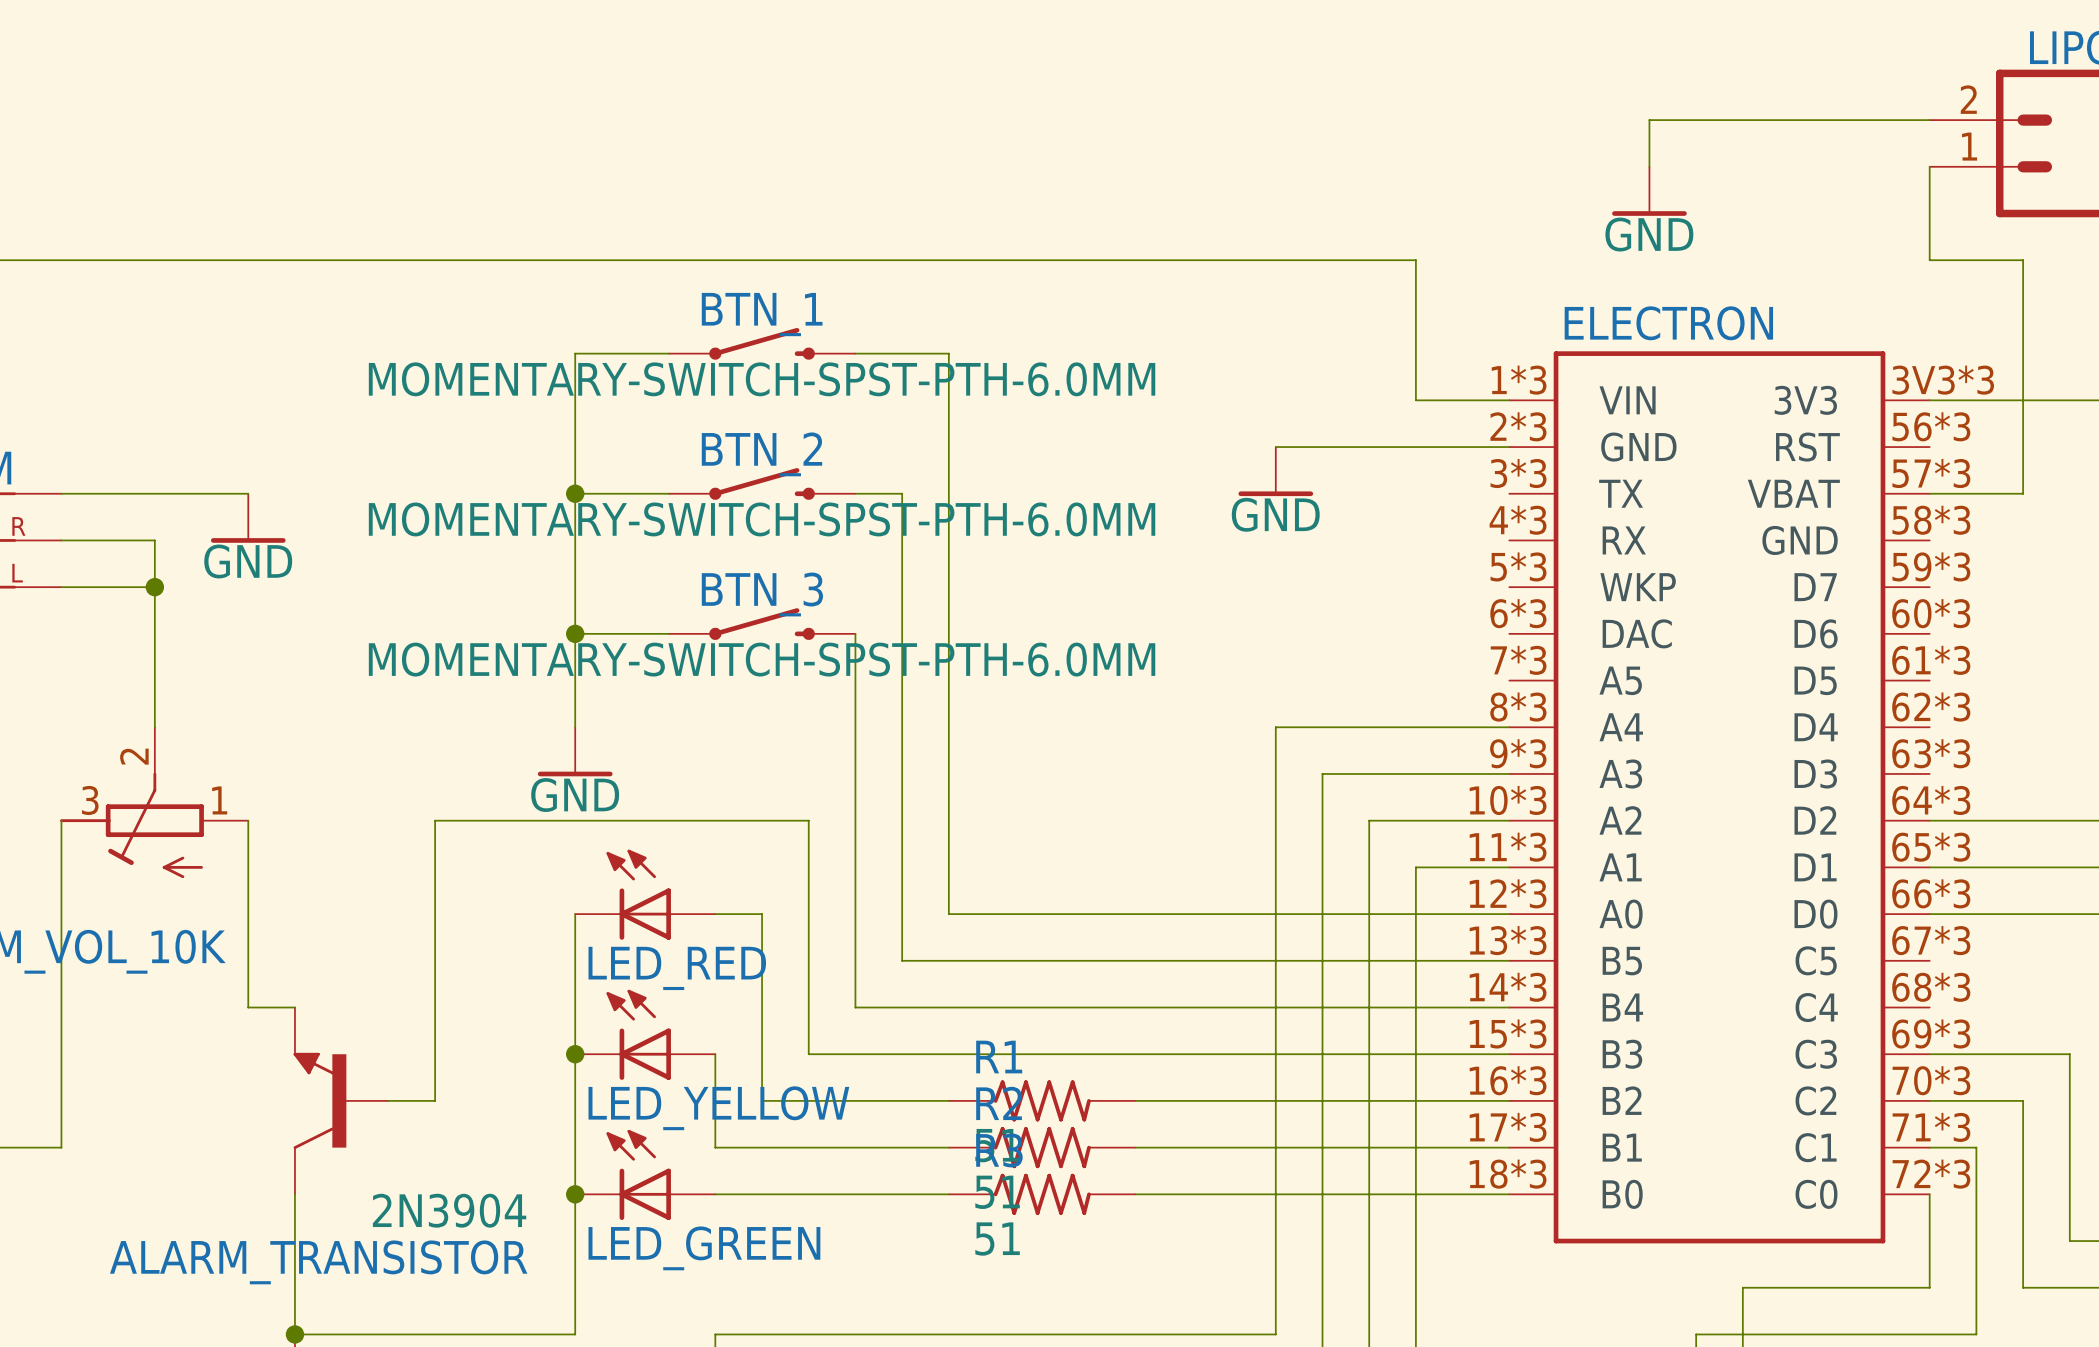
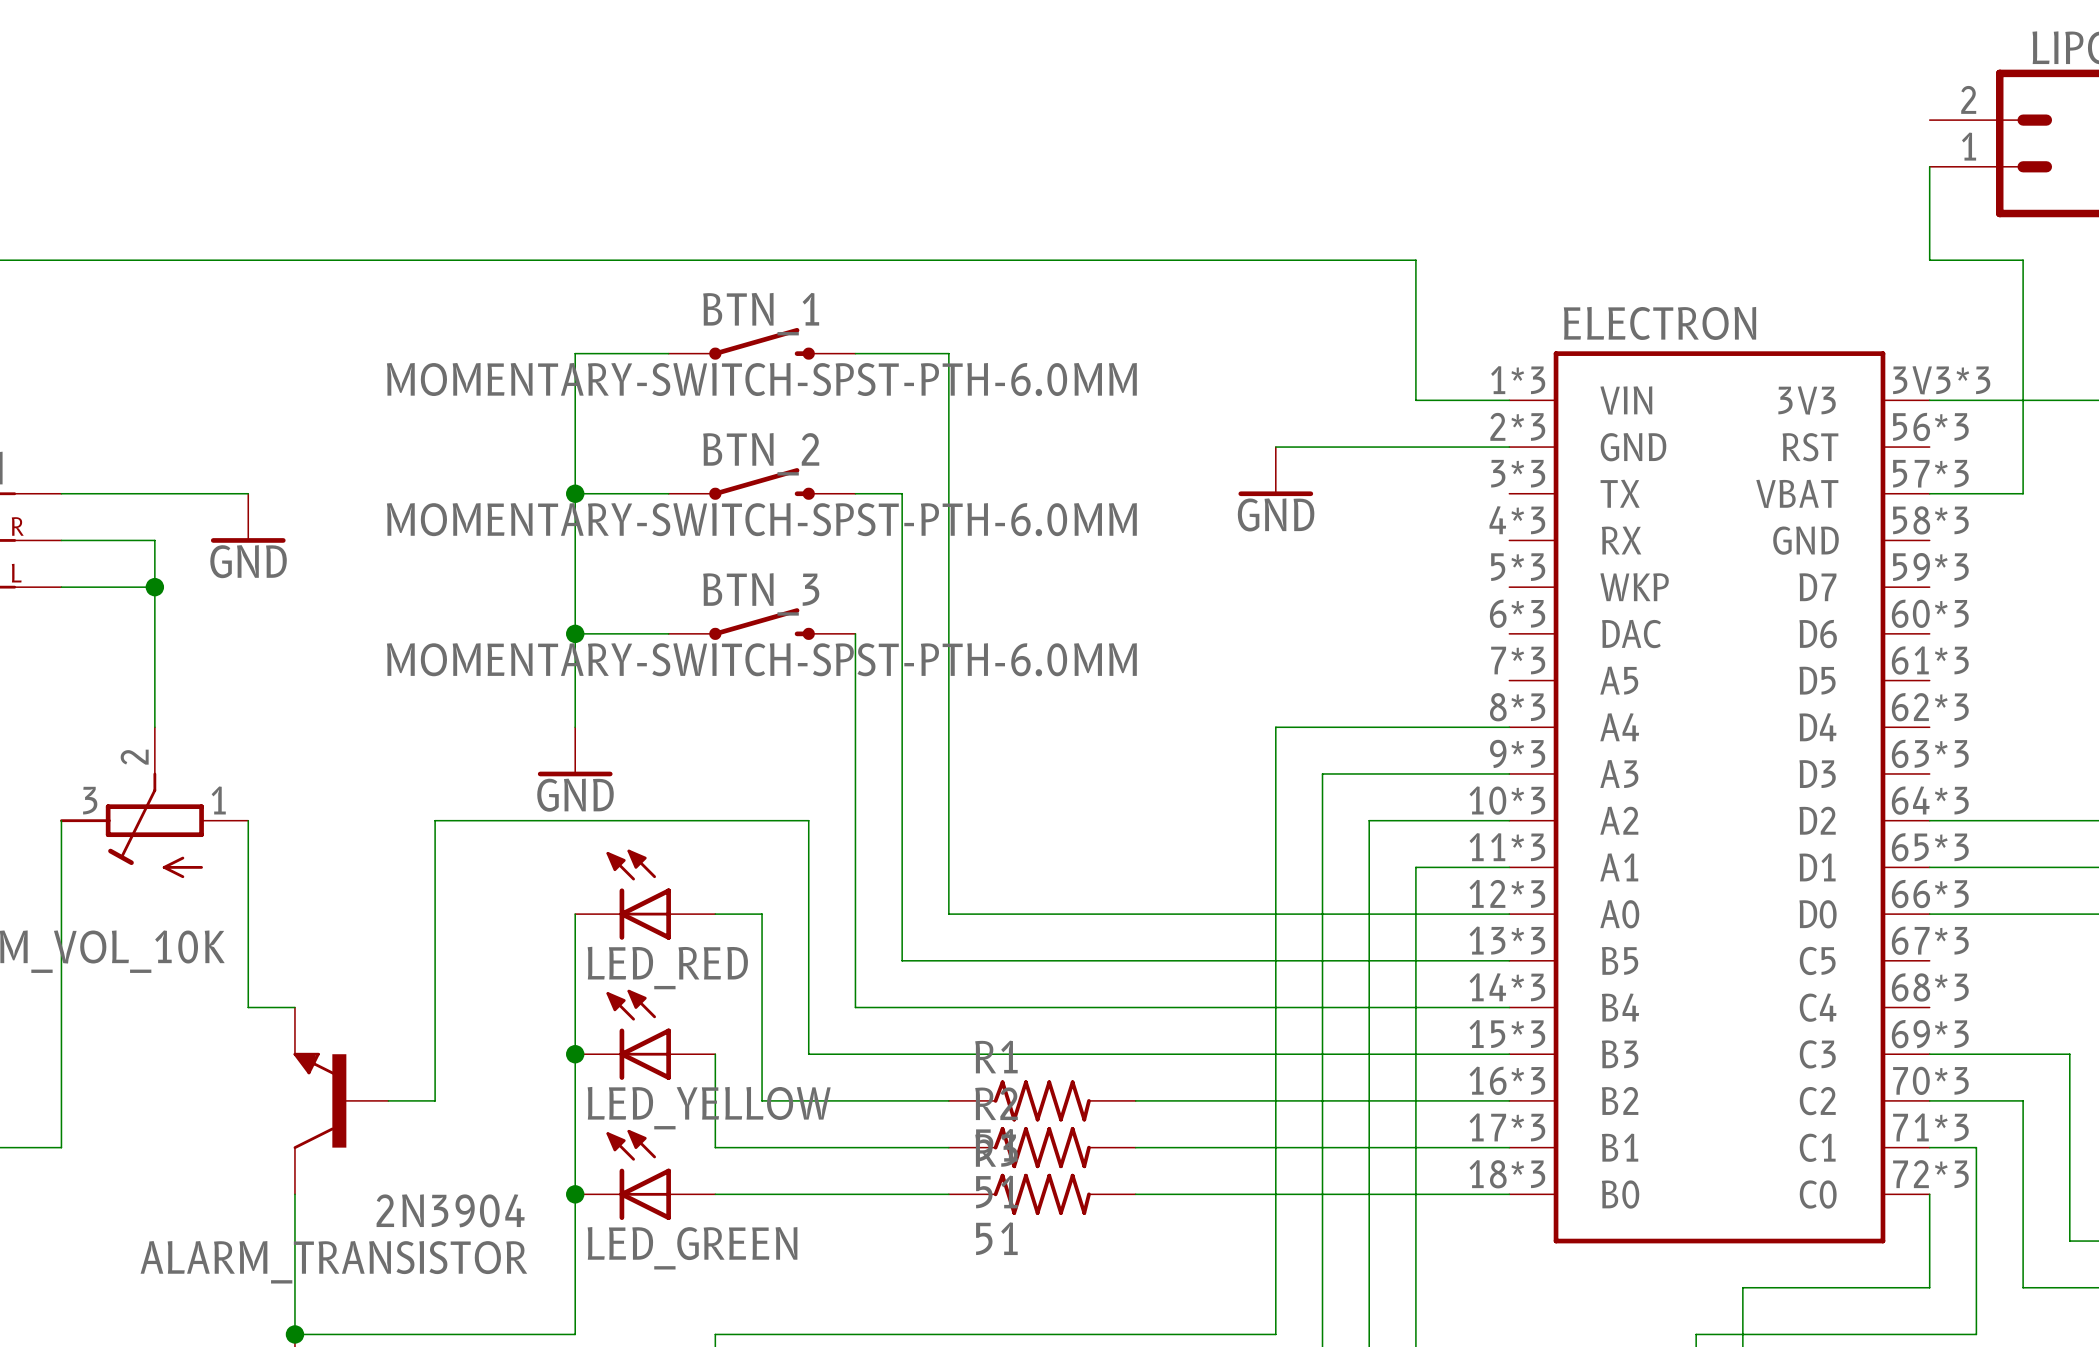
wire: (1929, 120) (1649, 120) (1649, 166) -> none
power symbol: GND (1649, 191) -> none

